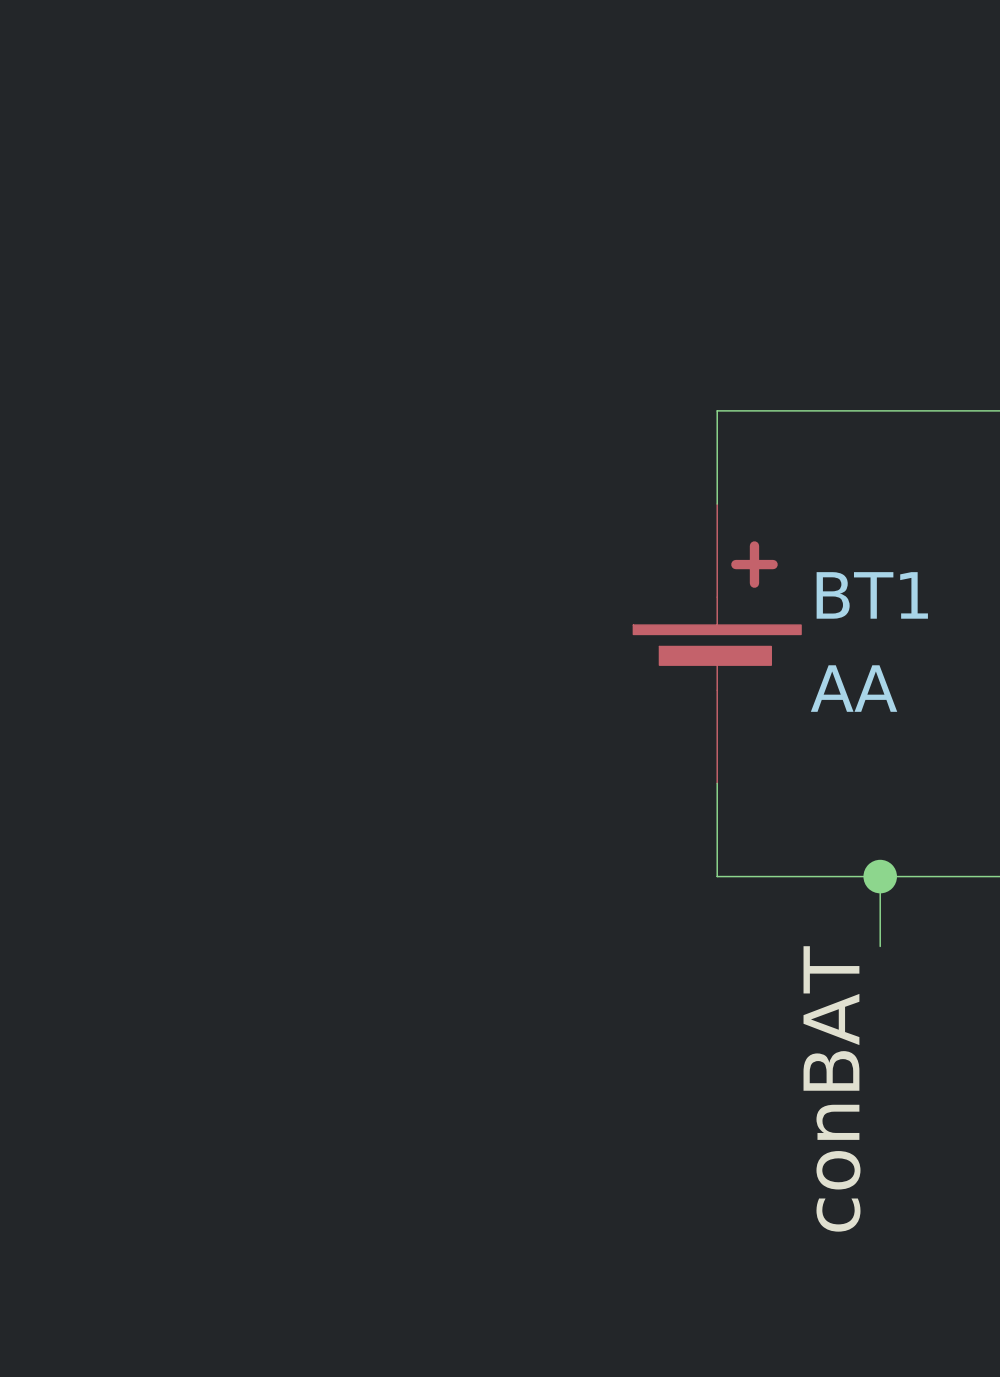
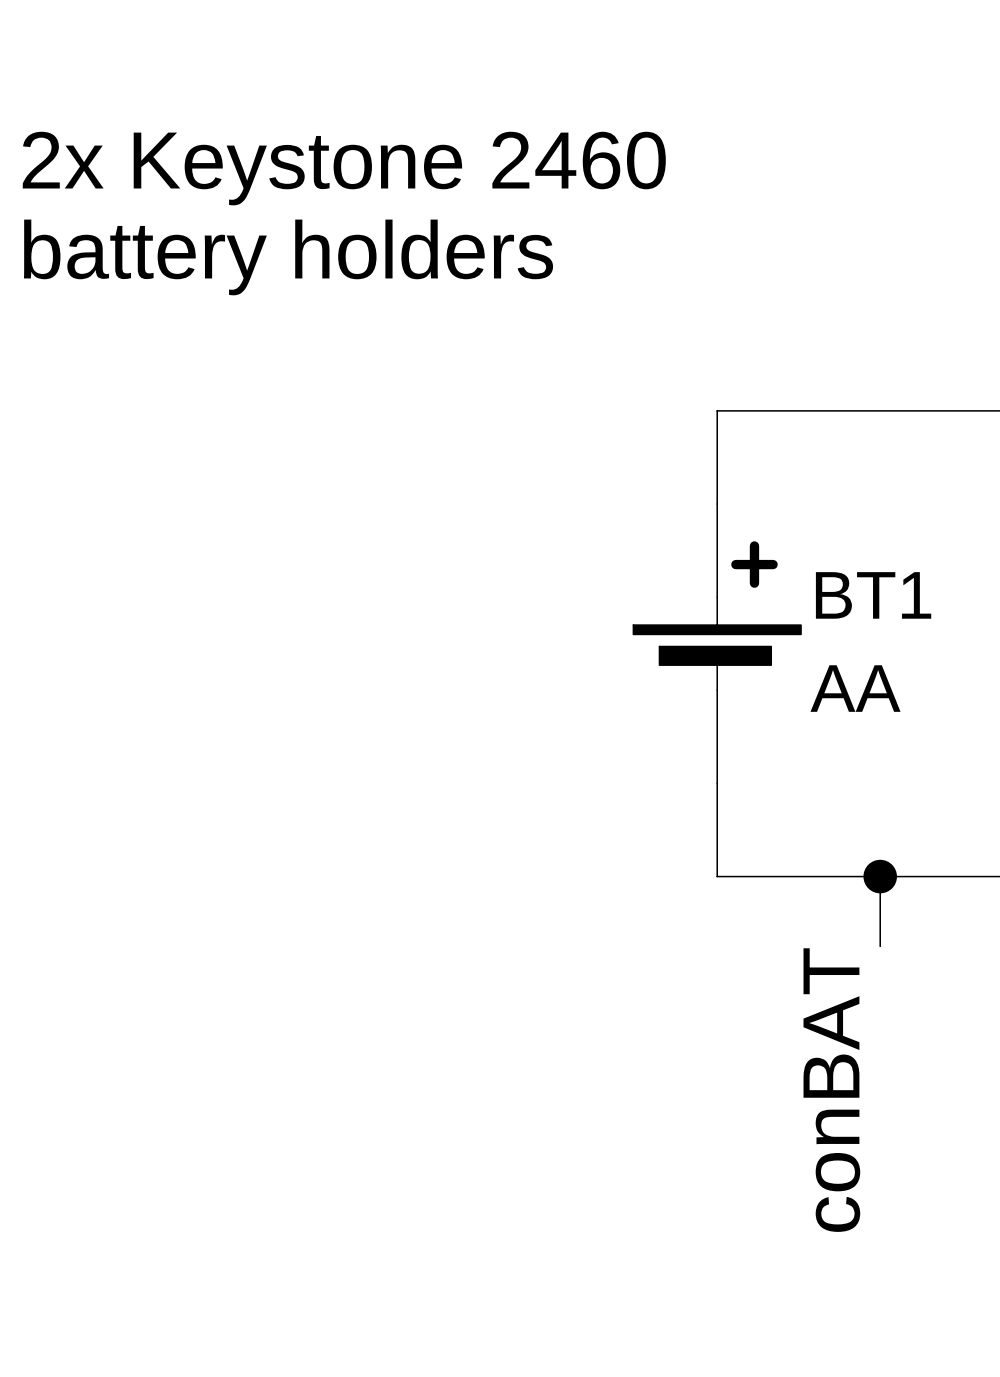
text: none -> 2x Keystone 2460 (344, 168)
text: none -> battery holders (288, 257)

